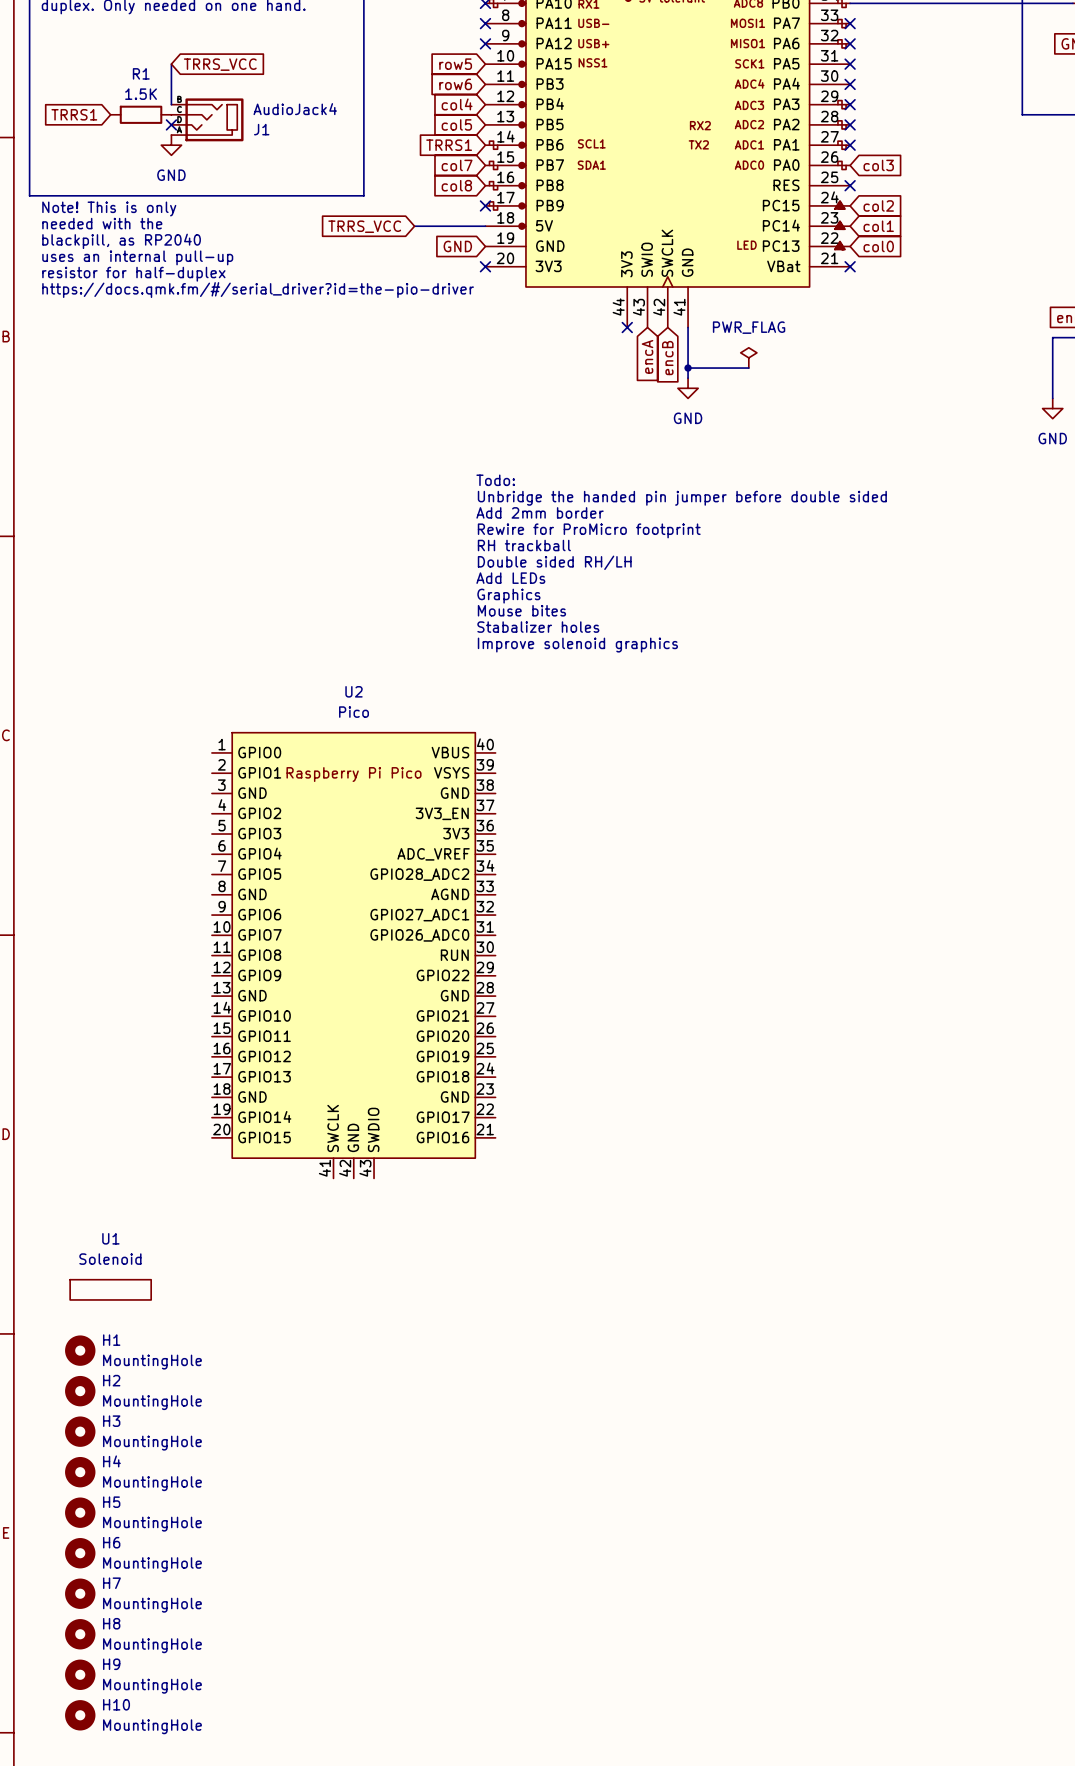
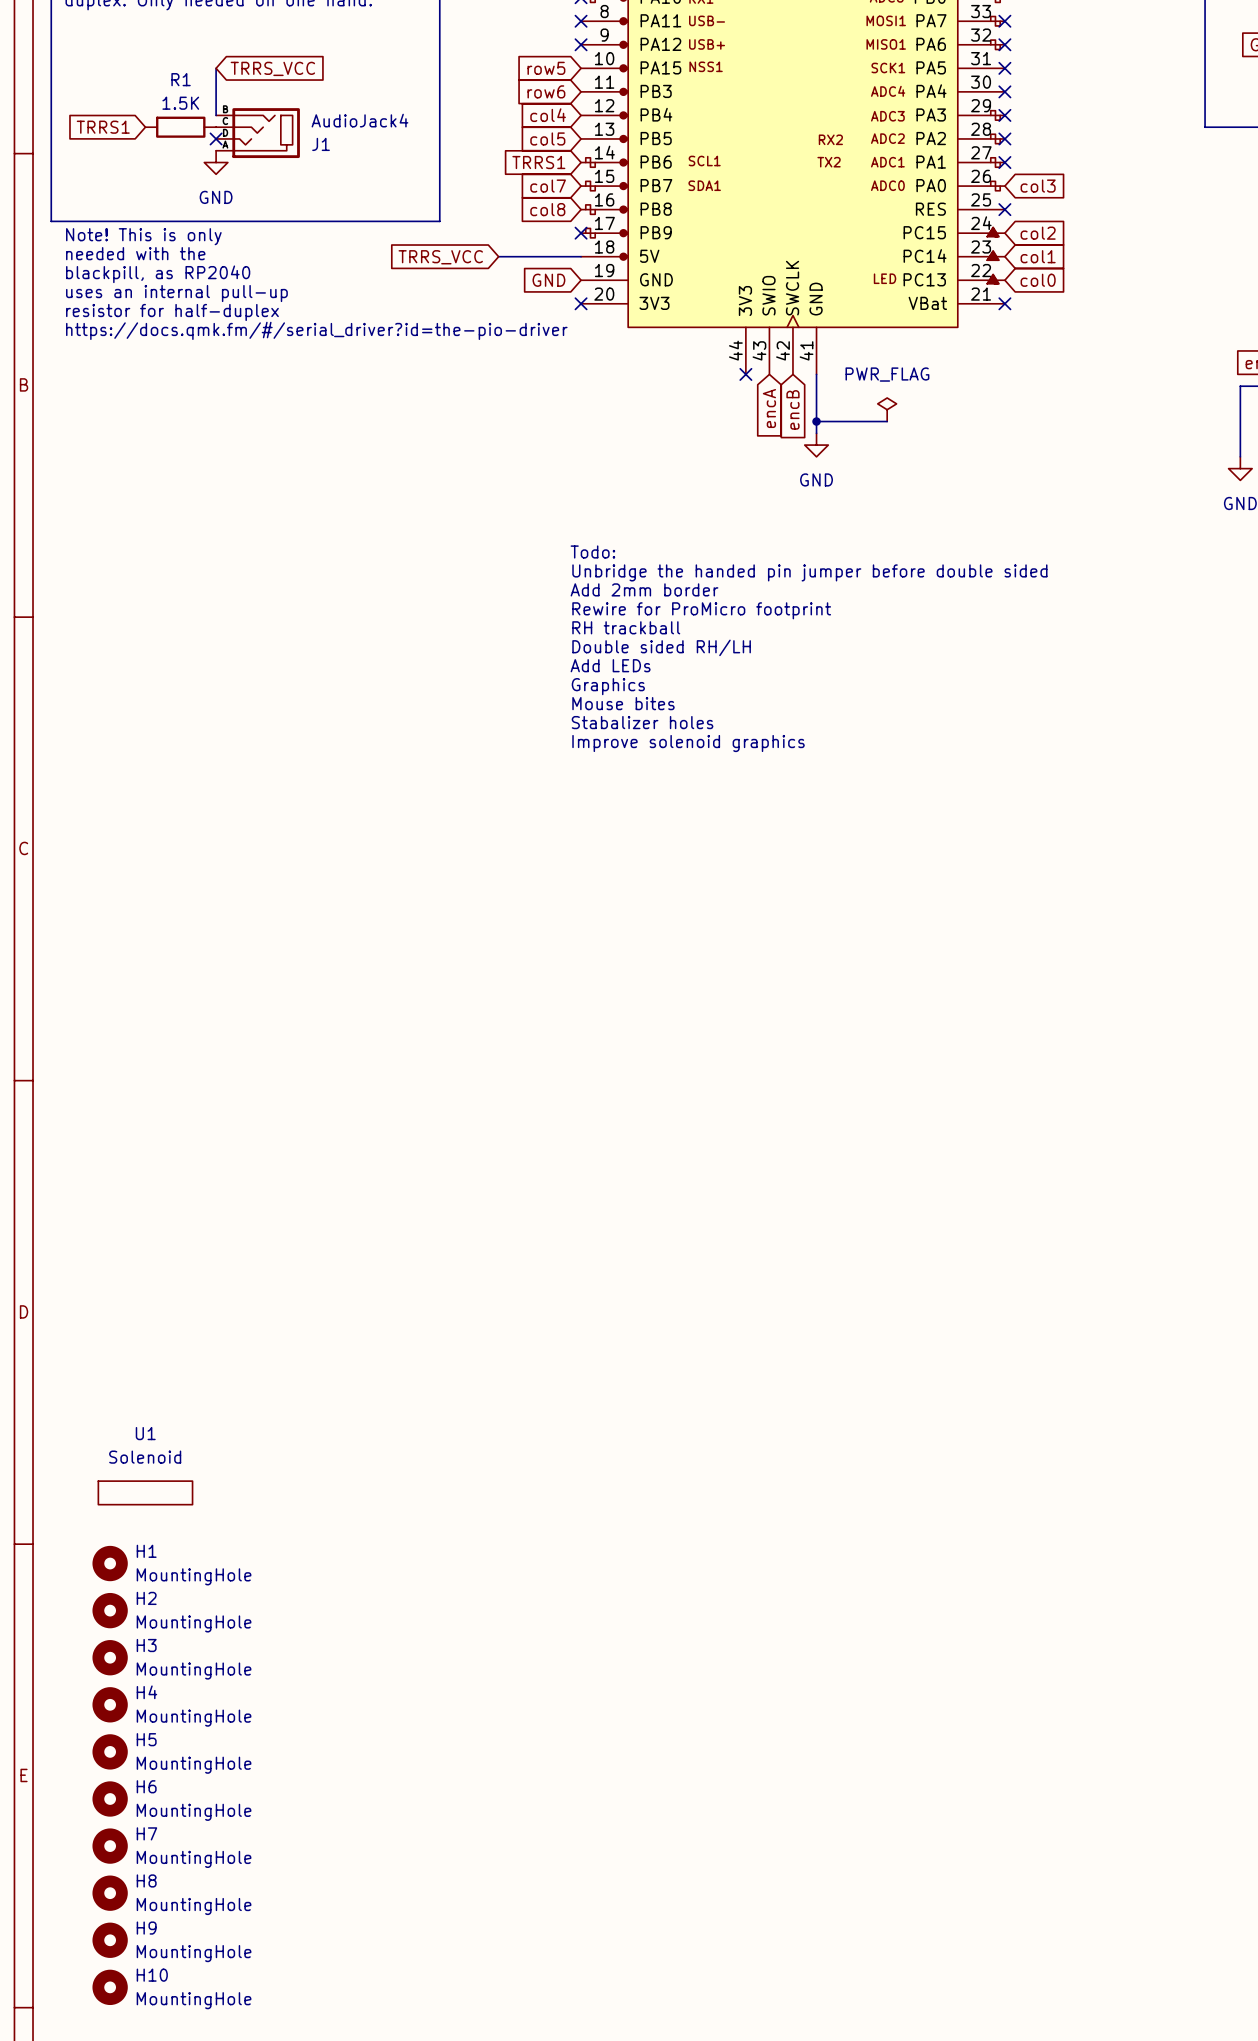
U2: Pico (353, 955) -> none

